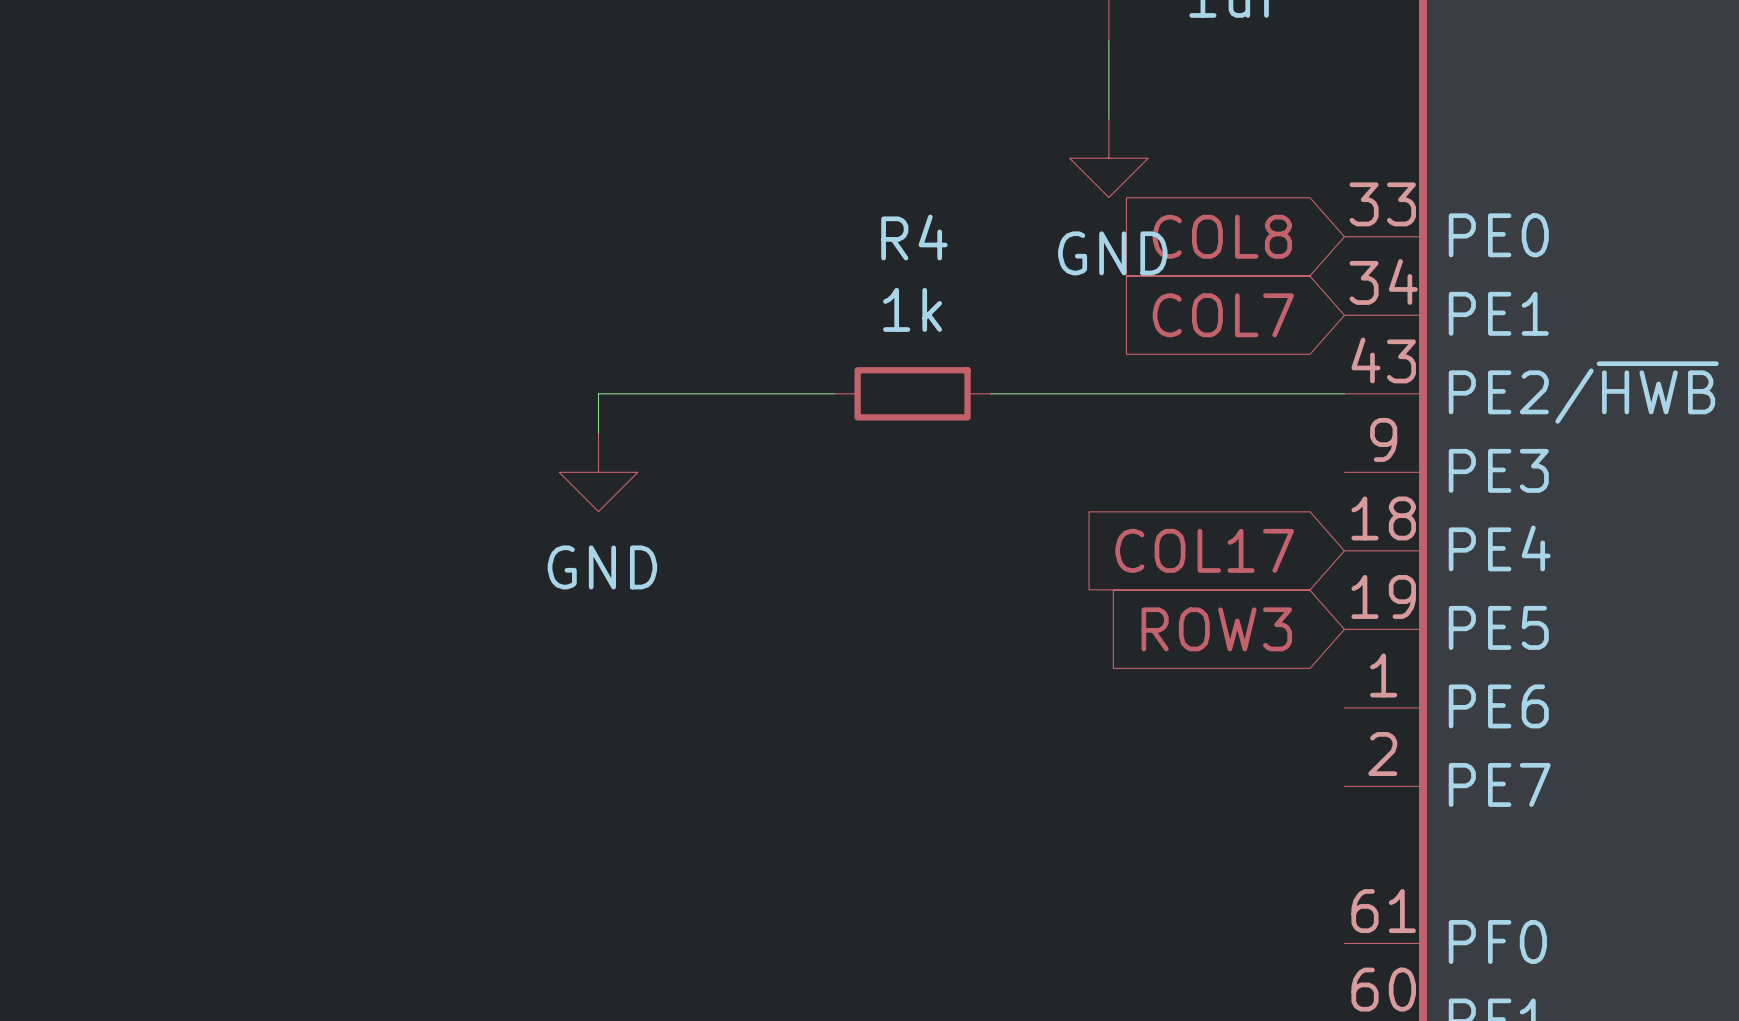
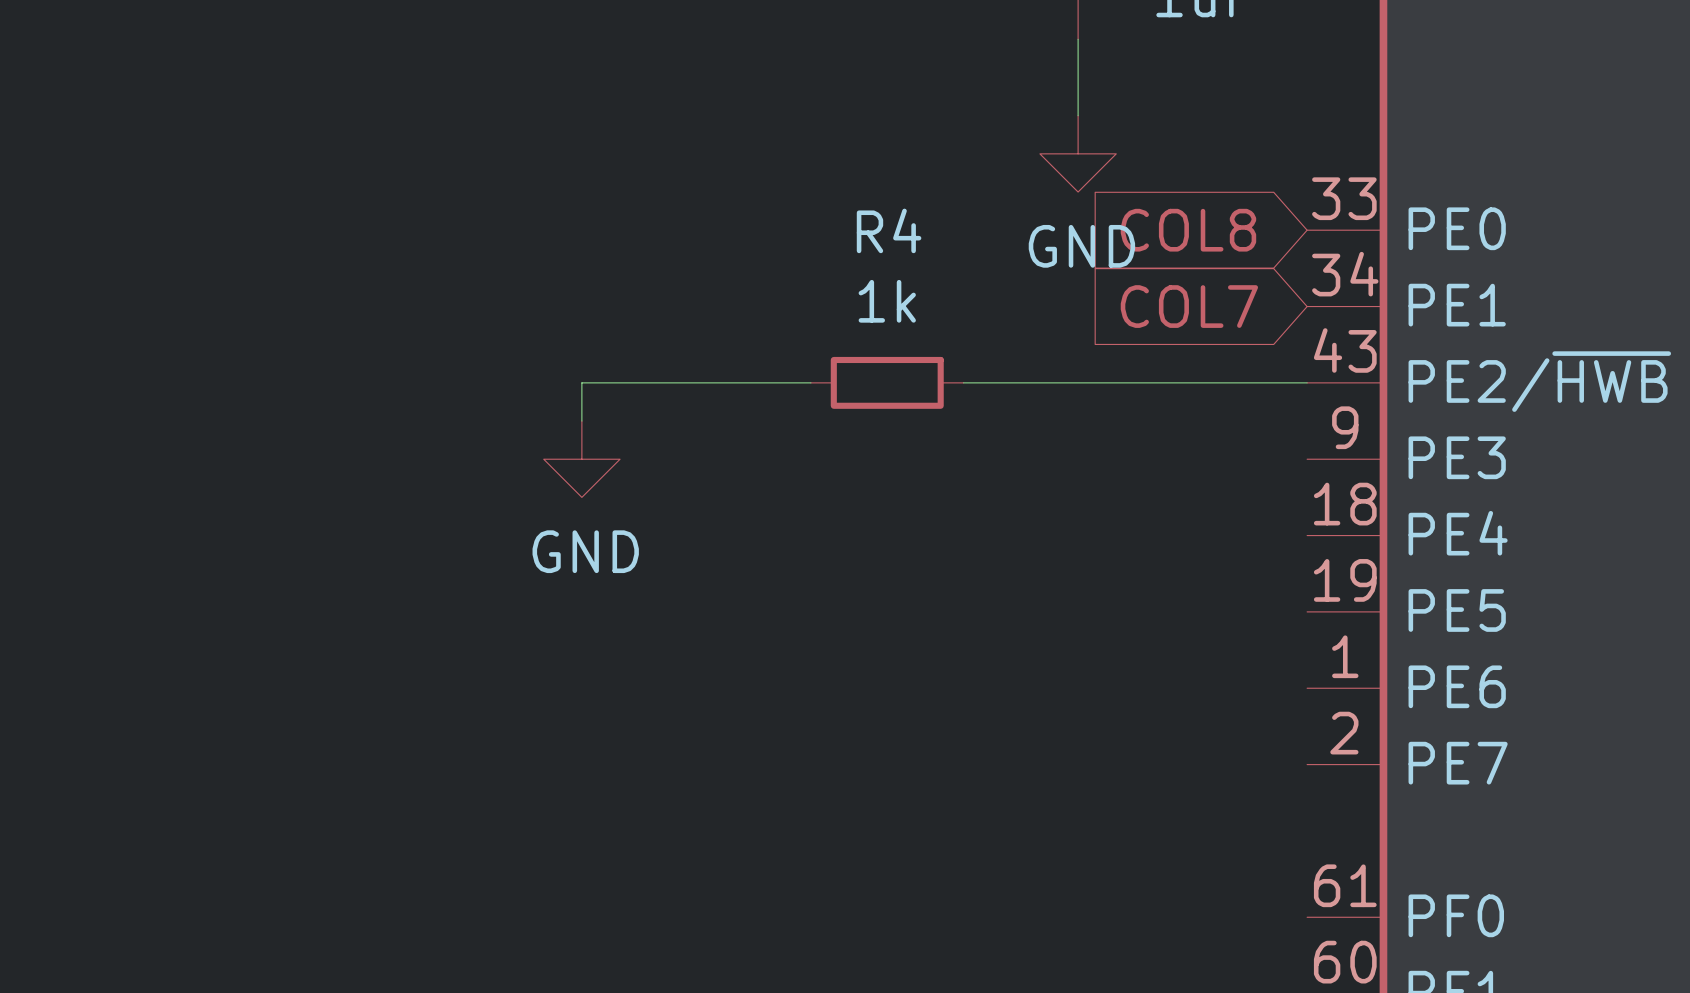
global label: COL17 (1204, 550) -> none
global label: ROW3 (1216, 629) -> none

